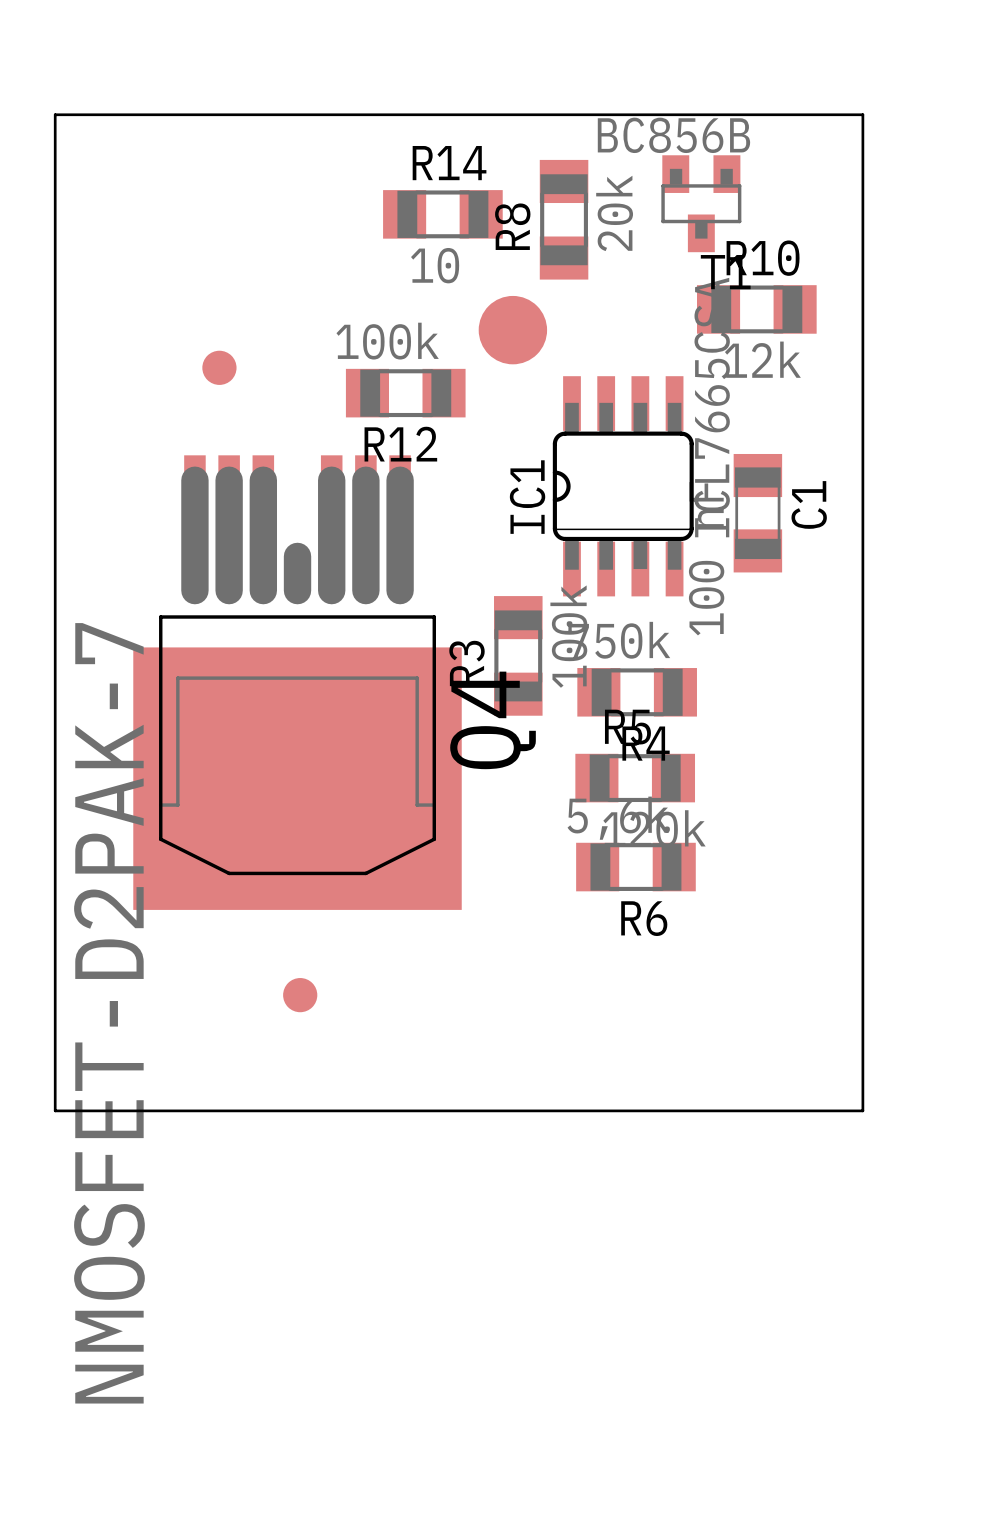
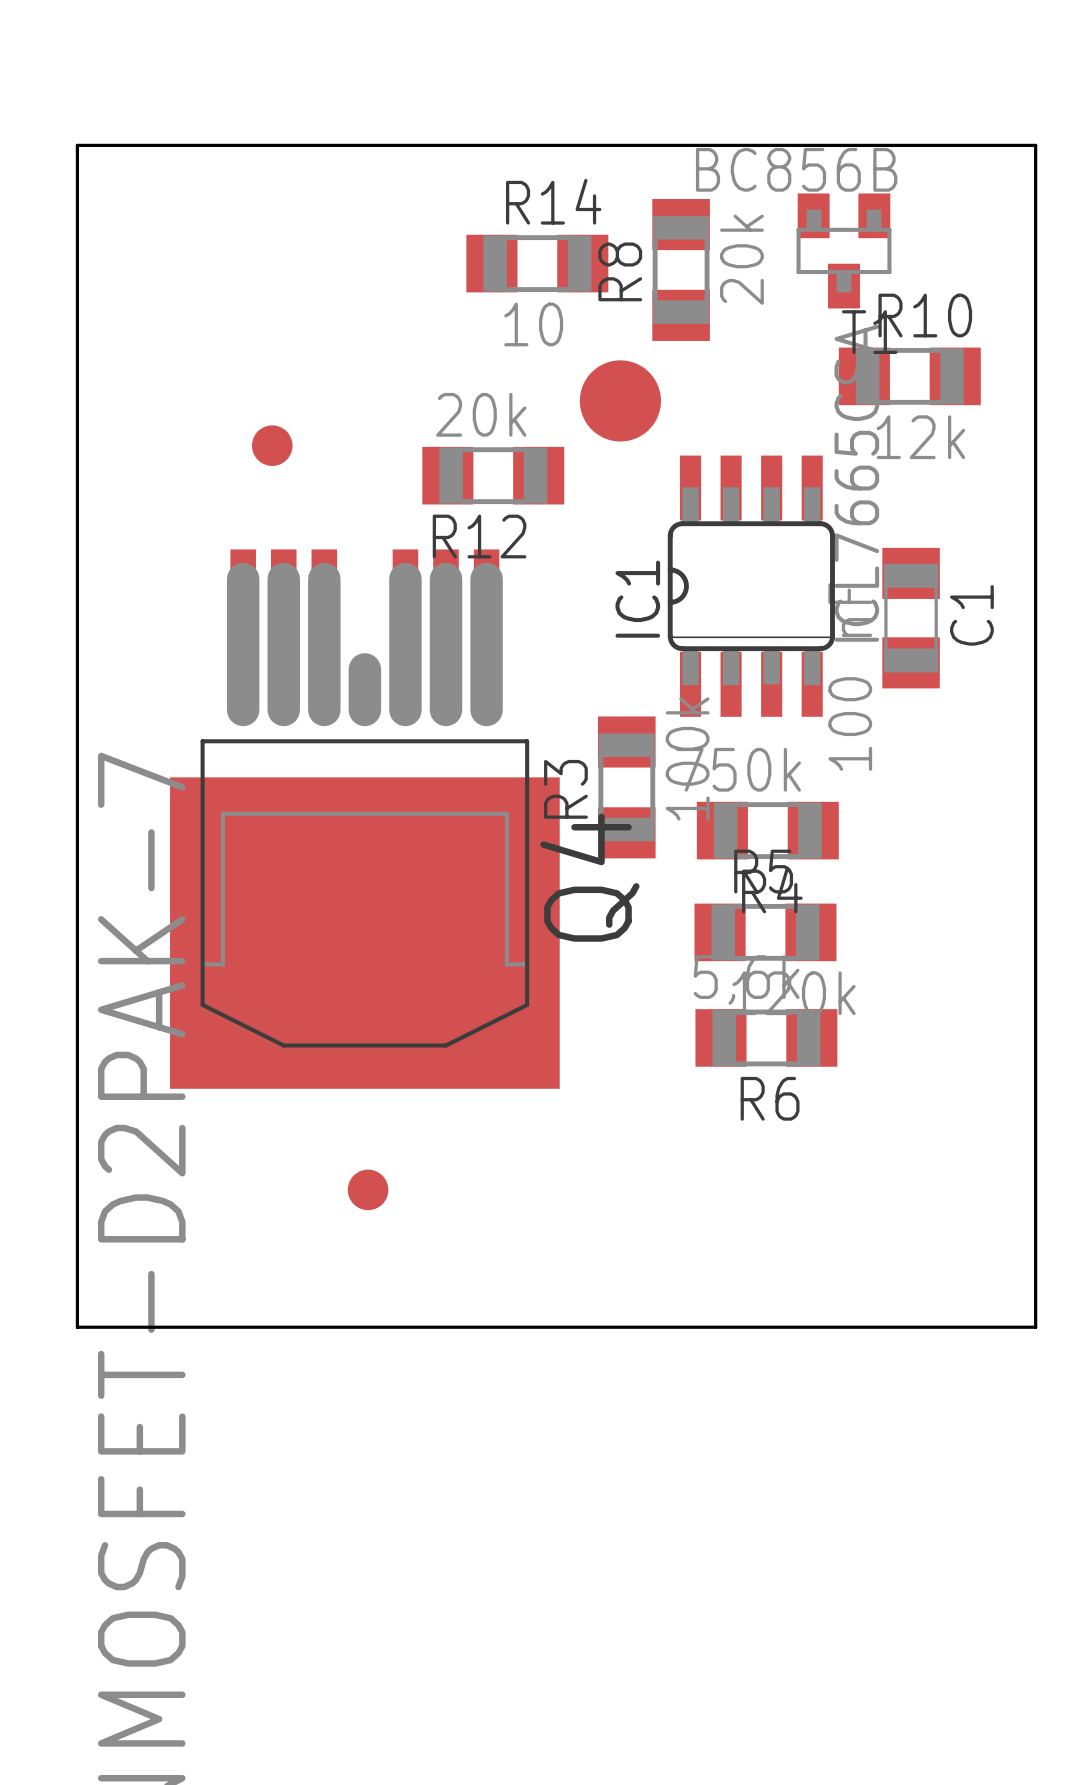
R12 value: 100k (387, 341) -> 20k (481, 414)

